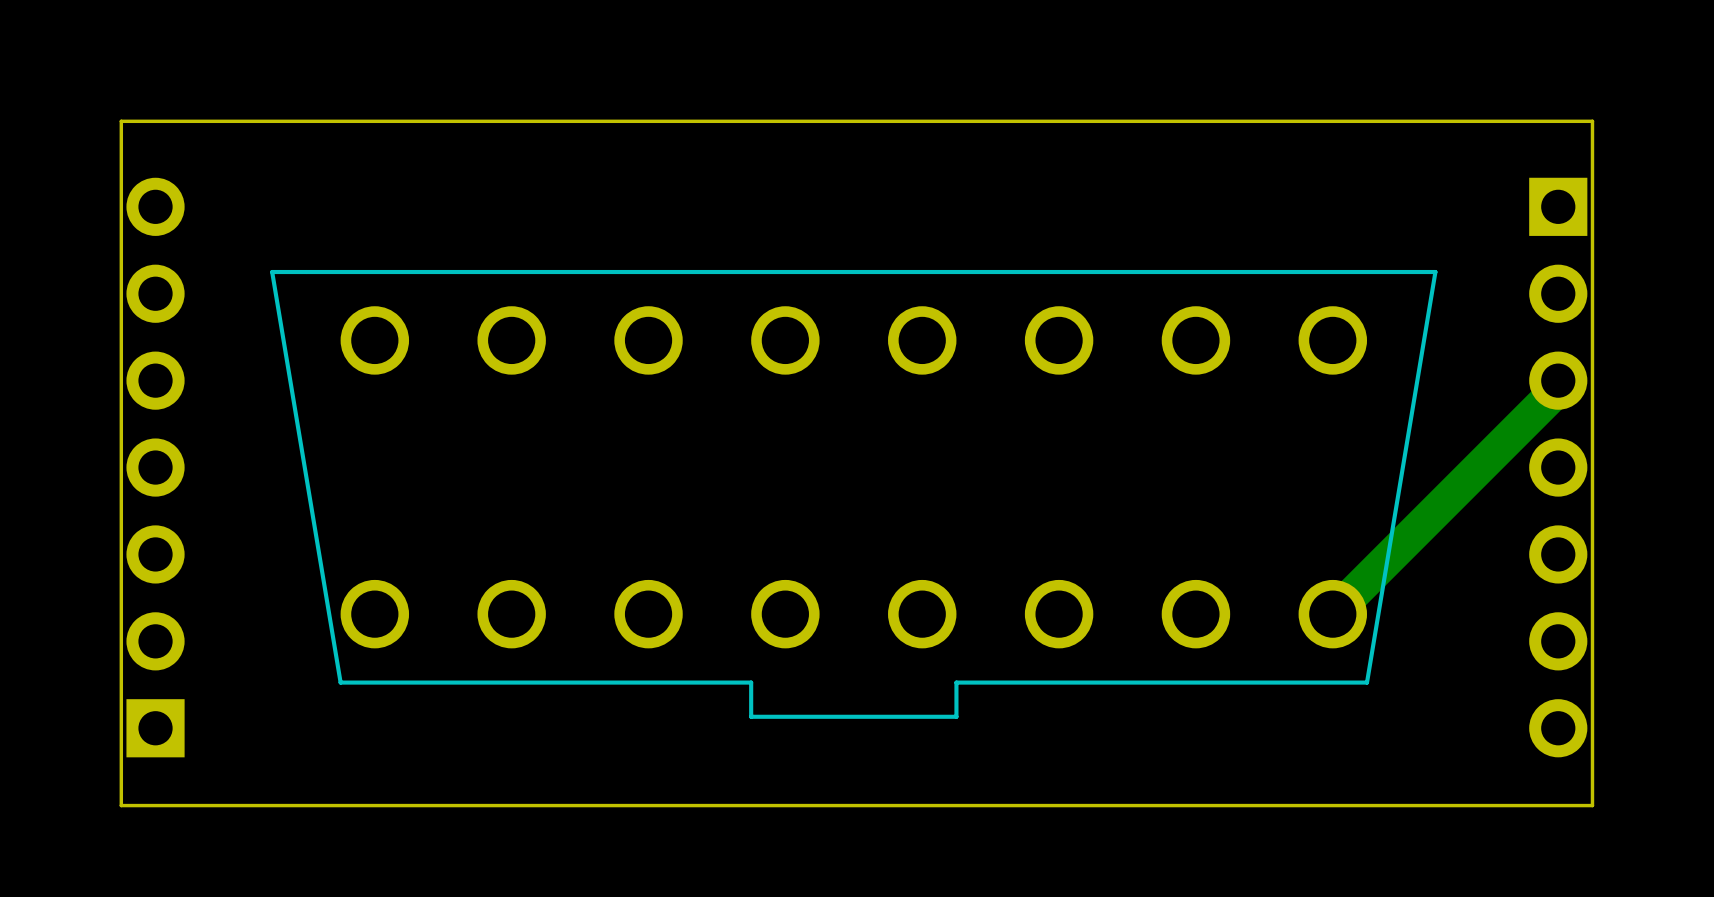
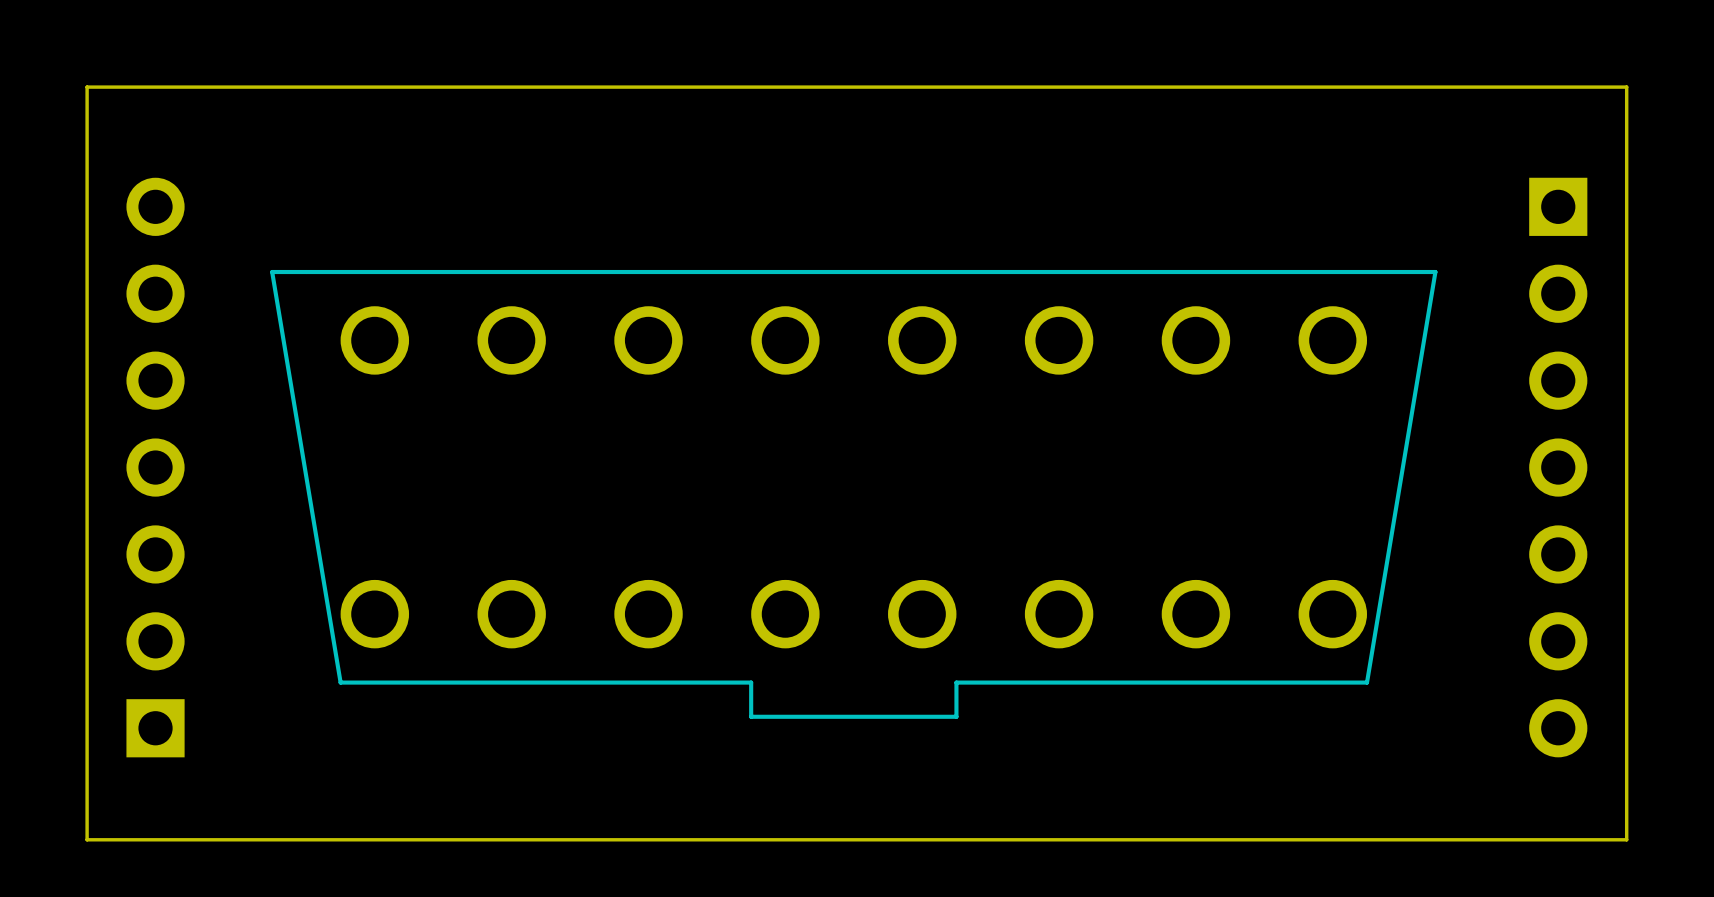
board edge: (1592, 121) (1592, 805) (121, 805) (121, 121) (1592, 121) -> (1626, 87) (1626, 839) (87, 839) (87, 87) (1626, 87)
track: (1558, 380) (1558, 388) (1332, 614) -> none

